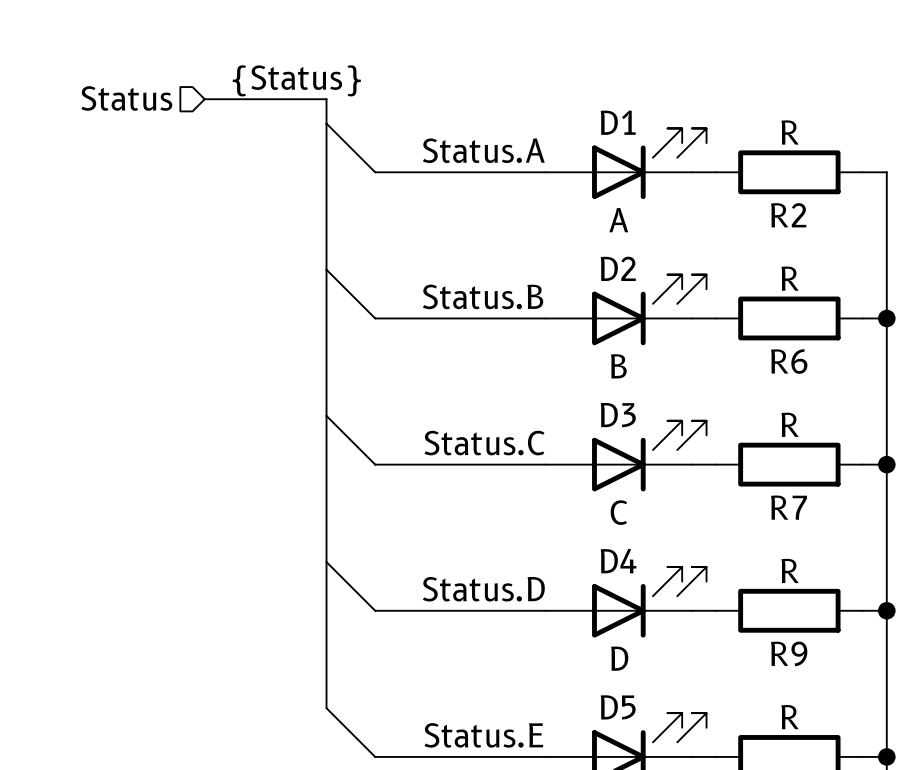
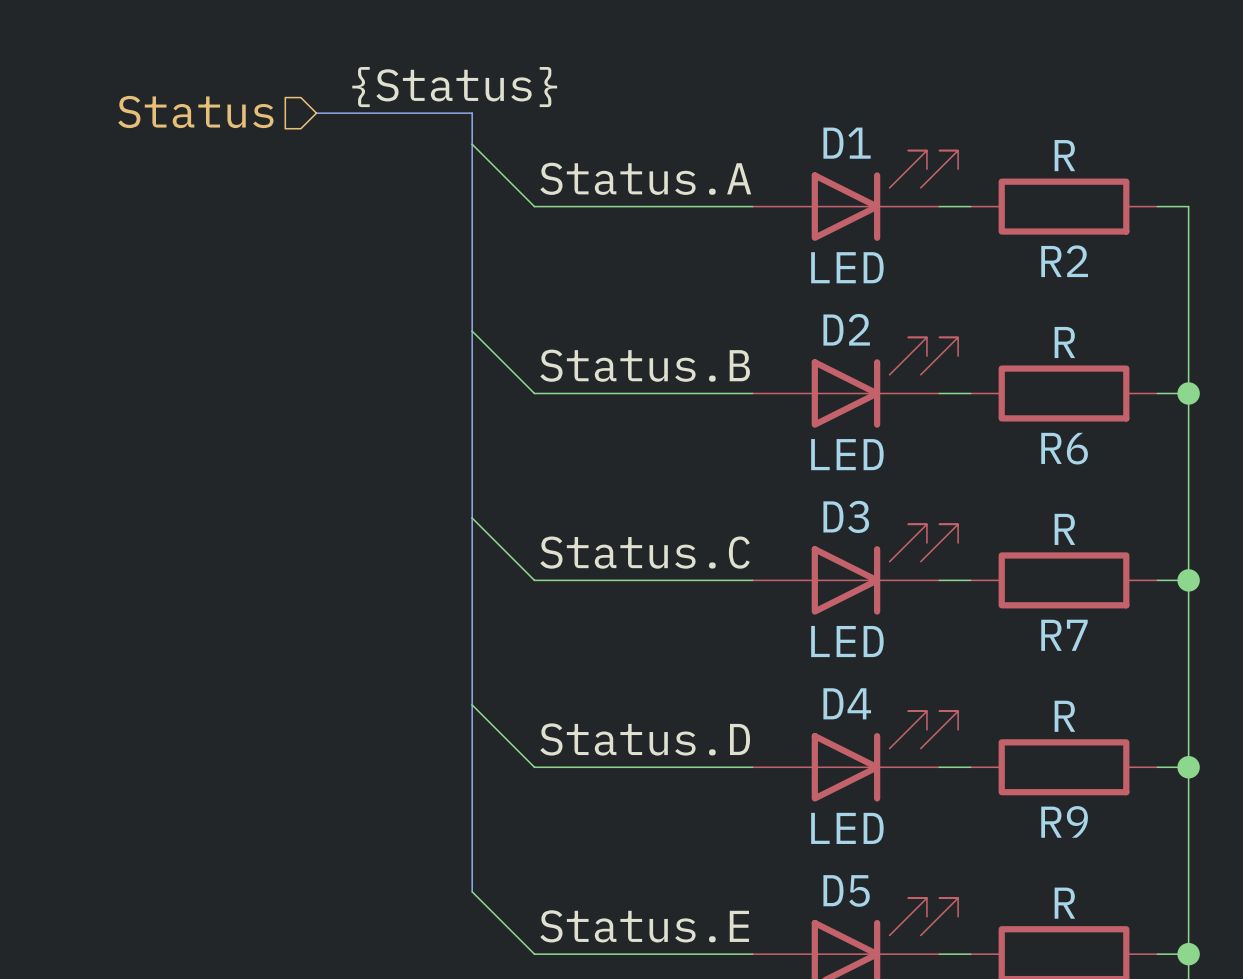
D1 value: A (618, 220) -> LED (847, 267)
D2 value: B (618, 366) -> LED (847, 454)
D3 value: C (618, 512) -> LED (847, 641)
D4 value: D (619, 658) -> LED (847, 828)

